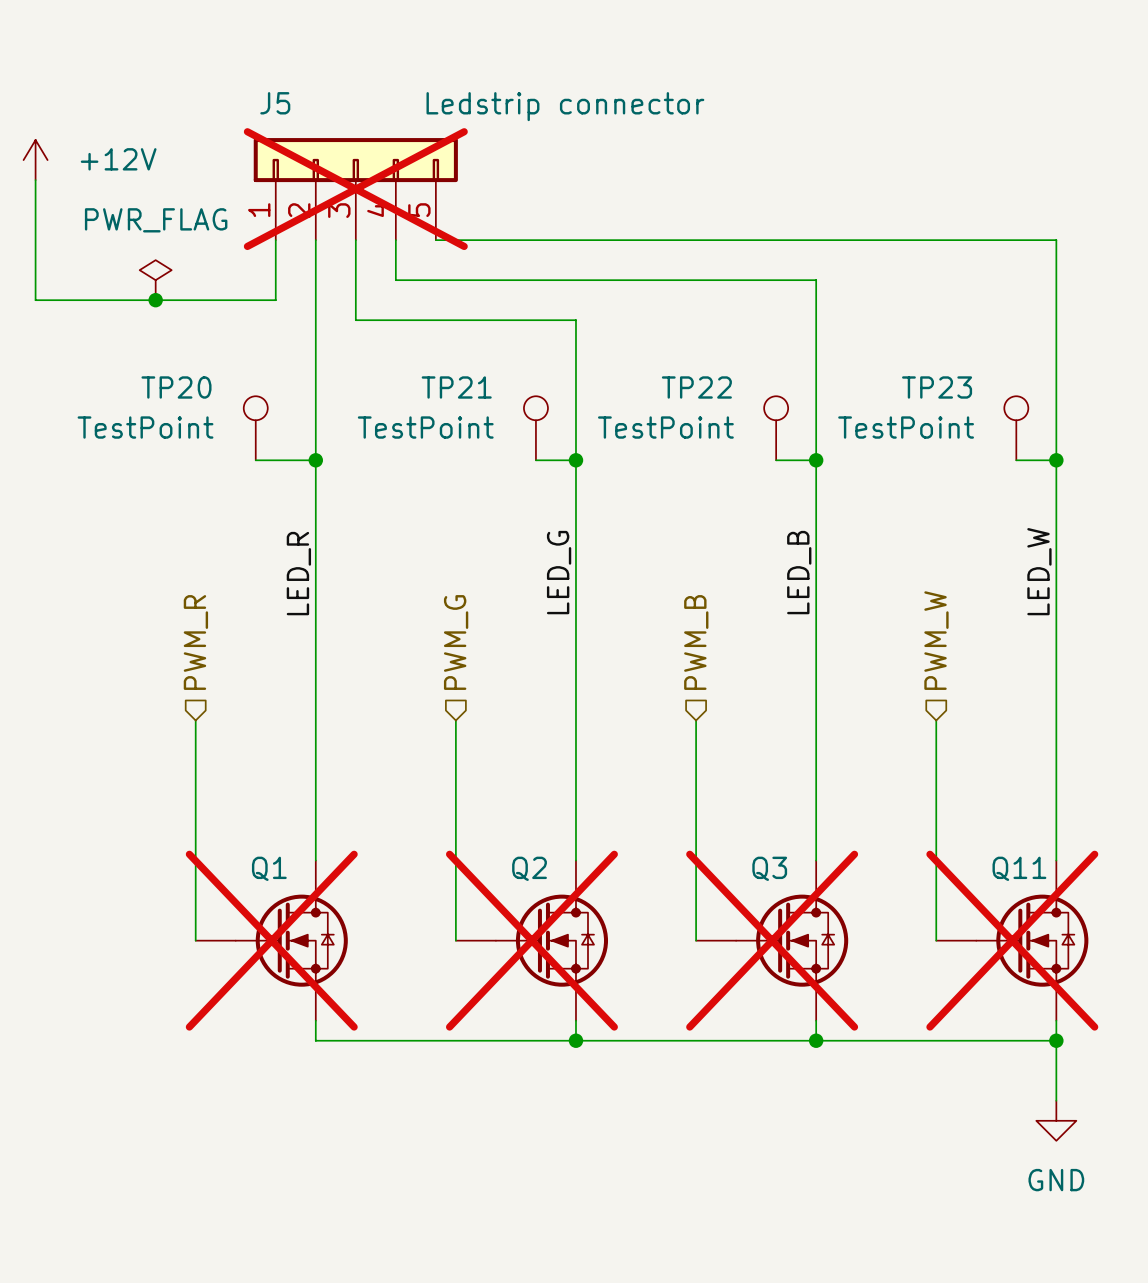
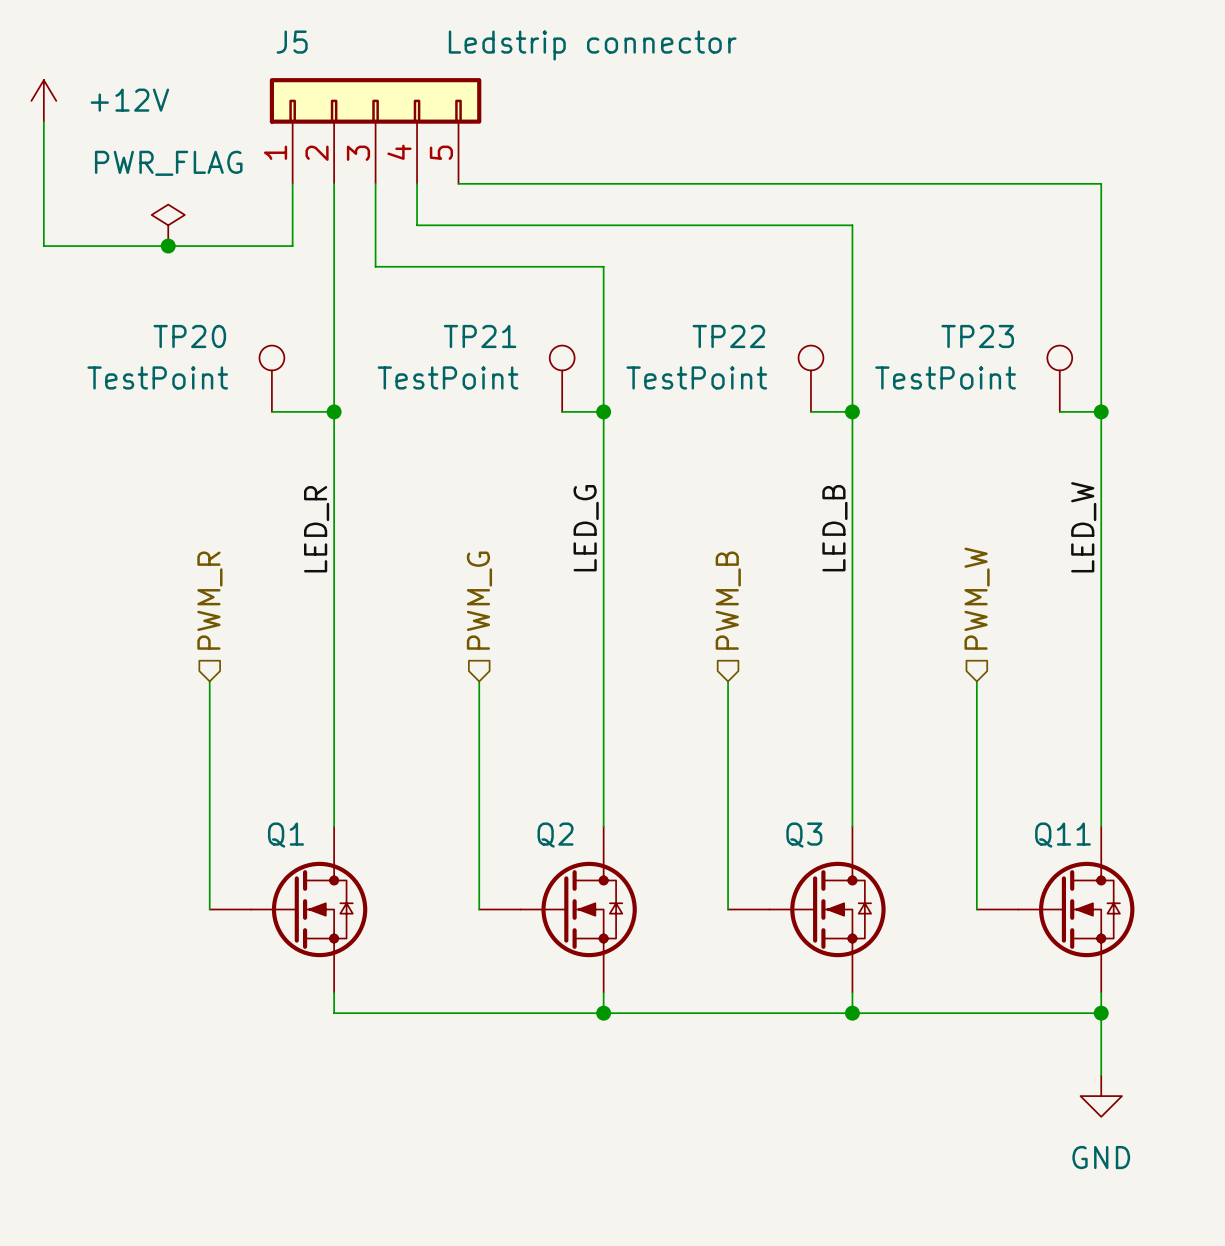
J5 do-not-place cross: (355, 189) -> none
Q1 do-not-place cross: (271, 940) -> none
Q2 do-not-place cross: (531, 940) -> none
Q3 do-not-place cross: (772, 940) -> none
Q11 do-not-place cross: (1012, 940) -> none

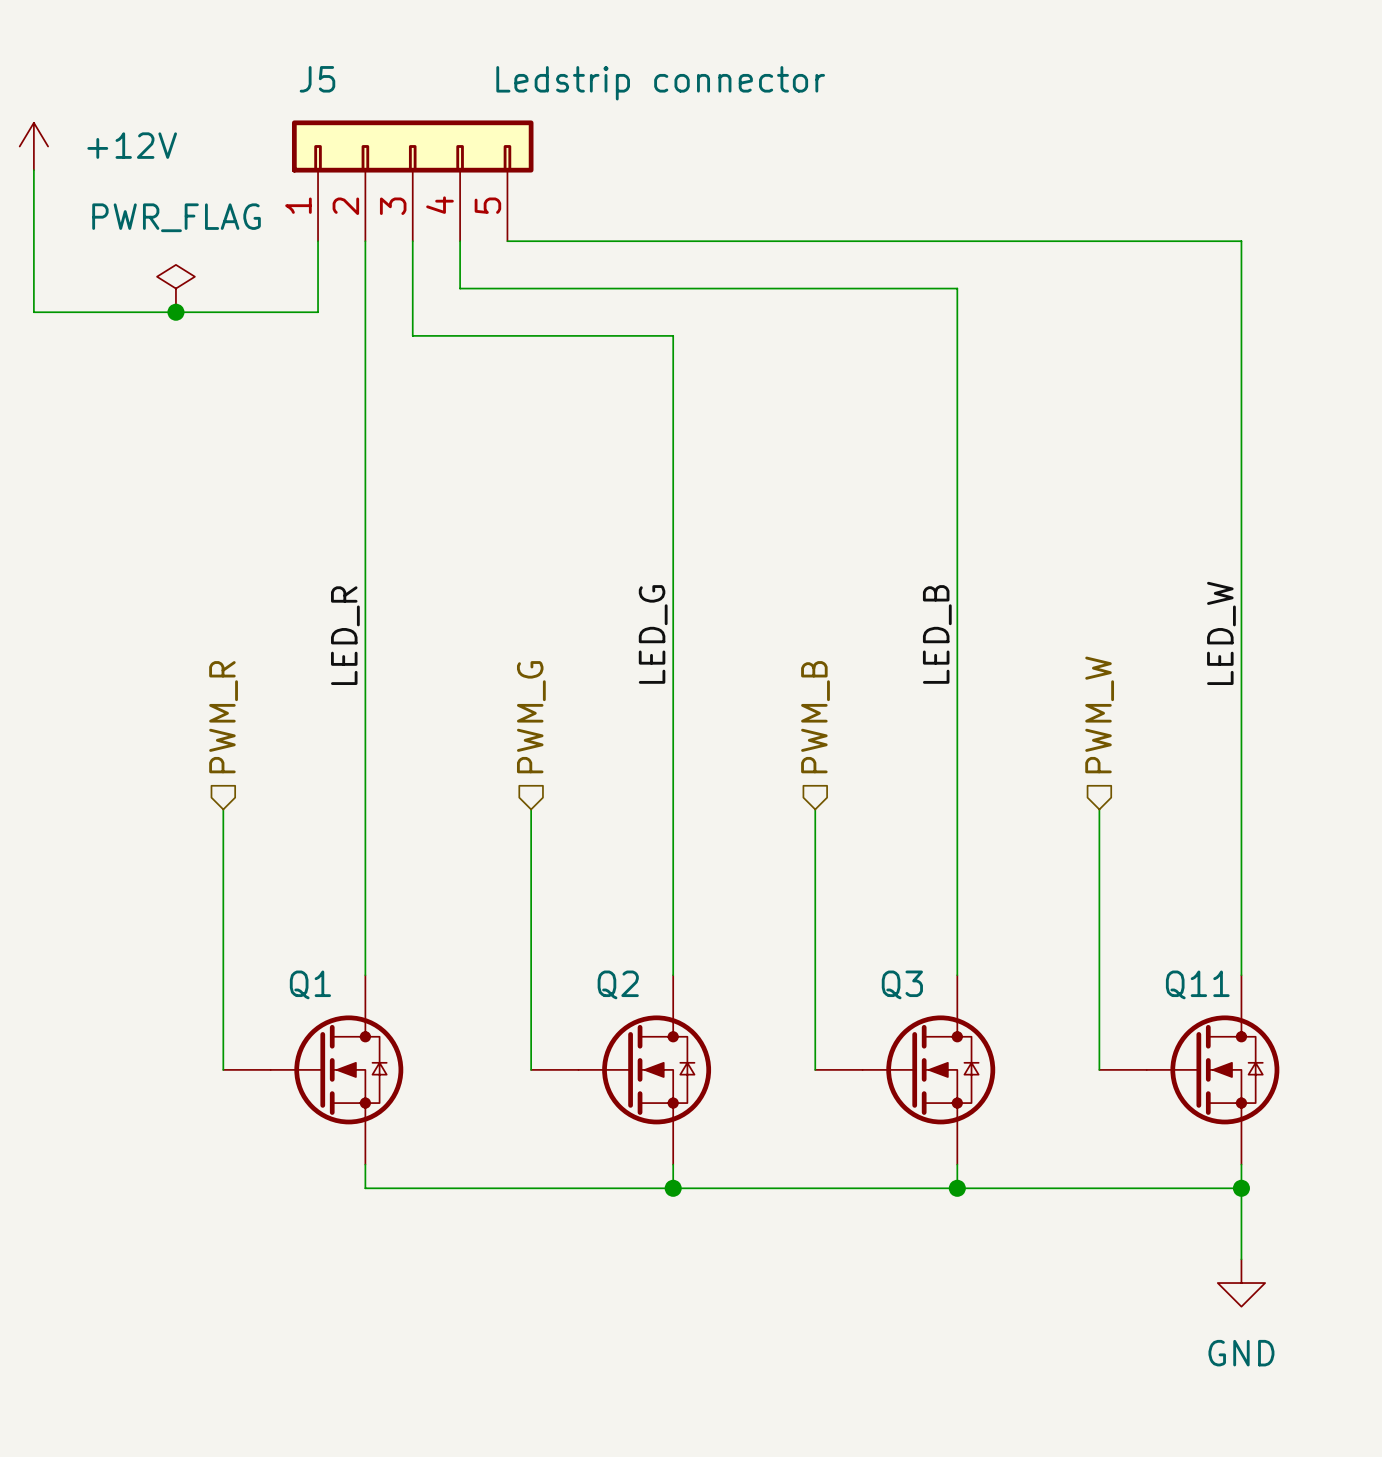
TP20: TestPoint (271, 378) -> none
TP21: TestPoint (562, 378) -> none
TP22: TestPoint (810, 378) -> none
TP23: TestPoint (1059, 378) -> none
wire: (271, 411) (334, 411) -> none
junction: (334, 411) -> none
wire: (562, 411) (603, 411) -> none
junction: (603, 411) -> none
wire: (810, 411) (852, 411) -> none
junction: (852, 411) -> none
wire: (1059, 411) (1101, 411) -> none
junction: (1101, 411) -> none

